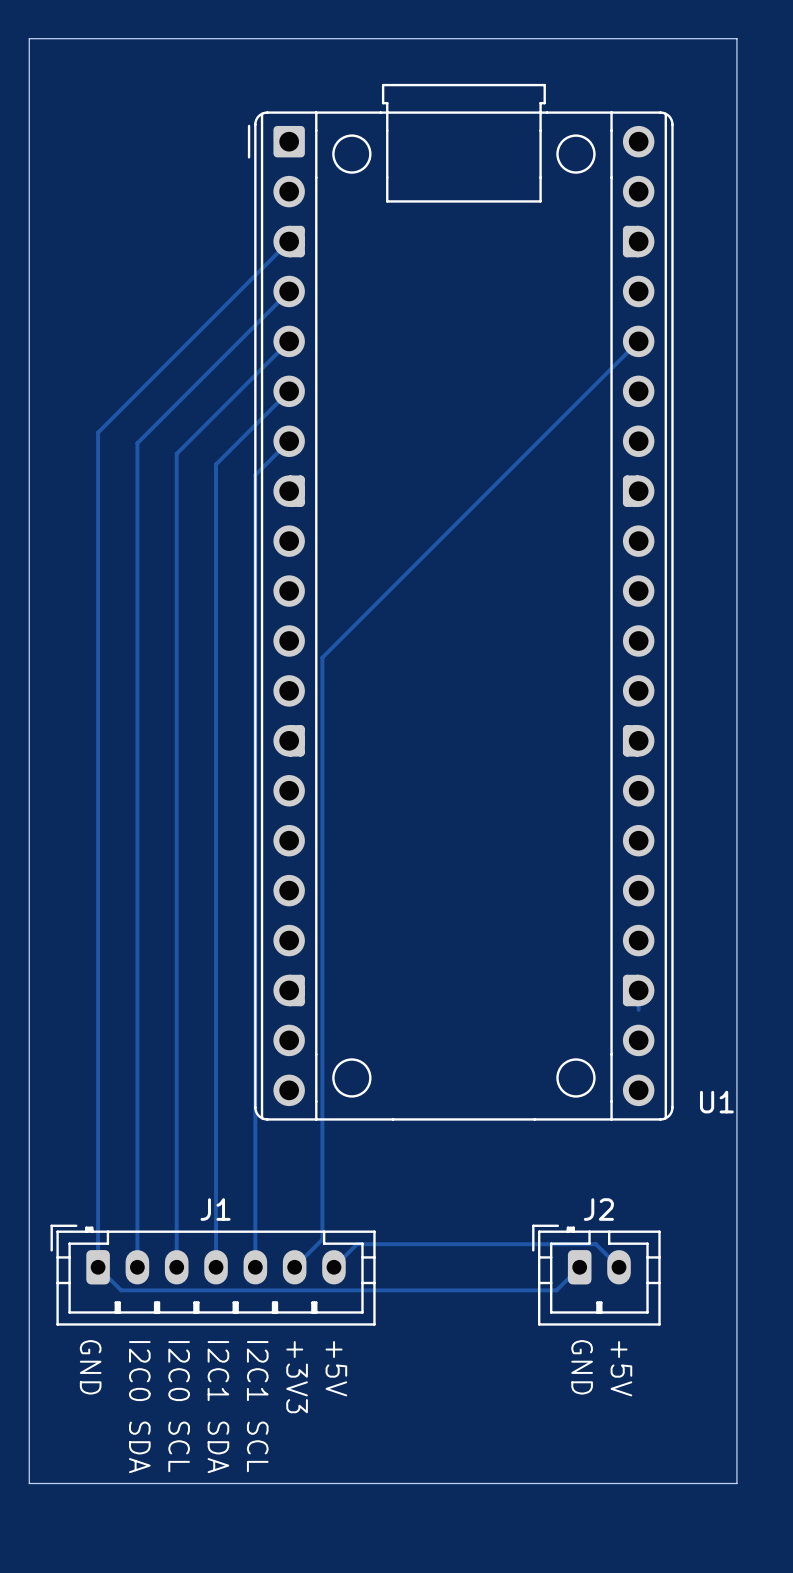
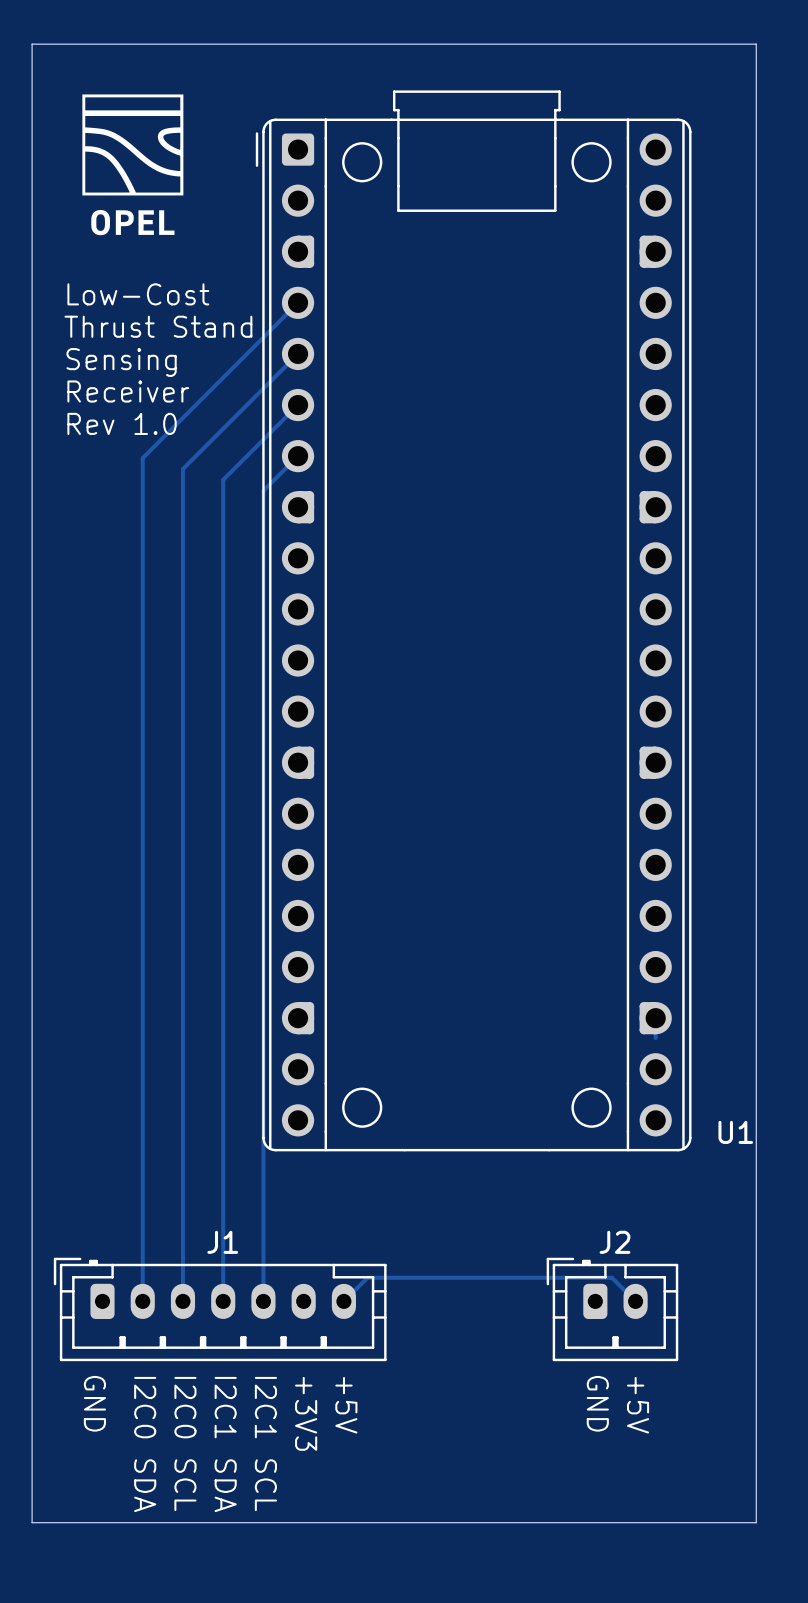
drawing: none -> [82, 94, 184, 236]
track: (289, 241) (98, 432) (98, 1267) (121, 1290) (556, 1290) (579, 1267) -> none
text: none -> Low-Cost (138, 294)
text: none -> Thrust Stand (158, 326)
track: (638, 341) (322, 657) (322, 1239) (294, 1267) -> none
text: none -> Sensing (121, 362)
text: none -> Receiver (128, 391)
text: none -> Rev 1.0 (122, 423)

